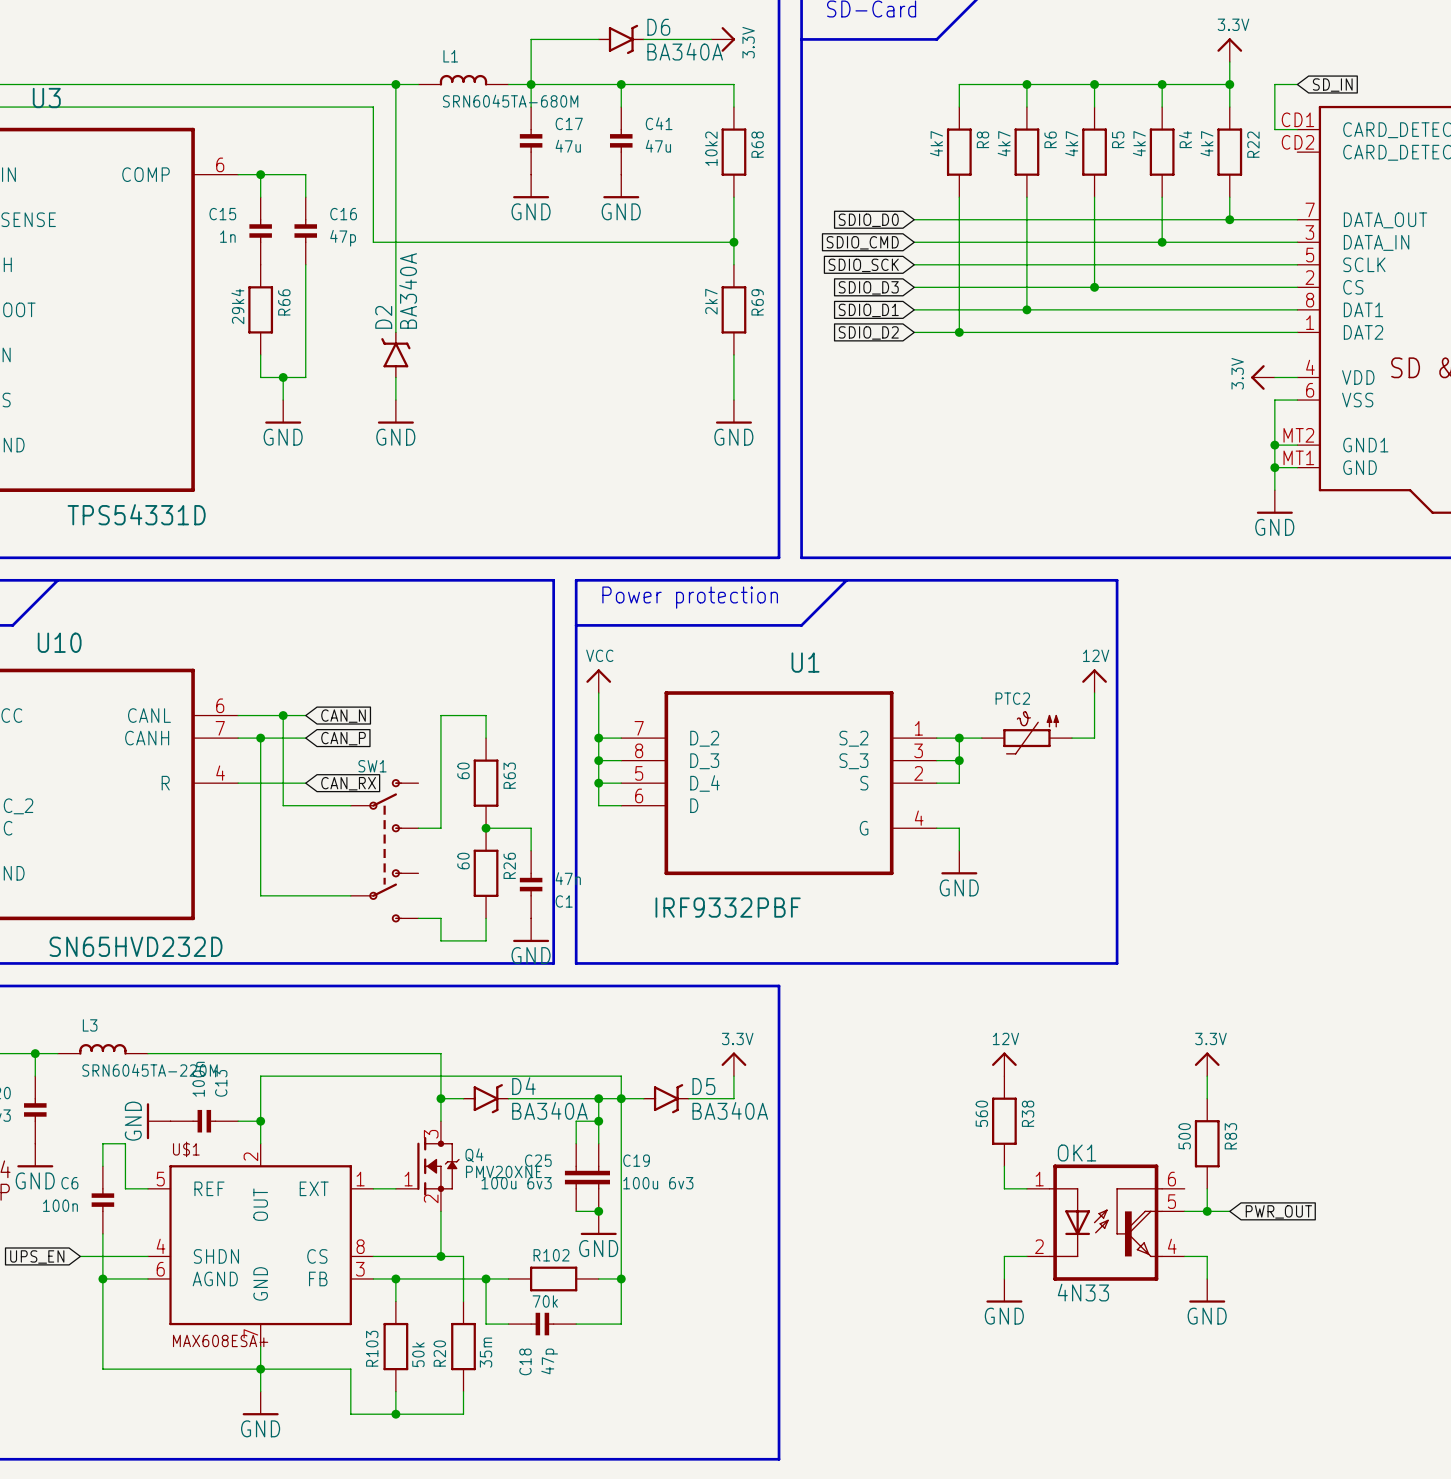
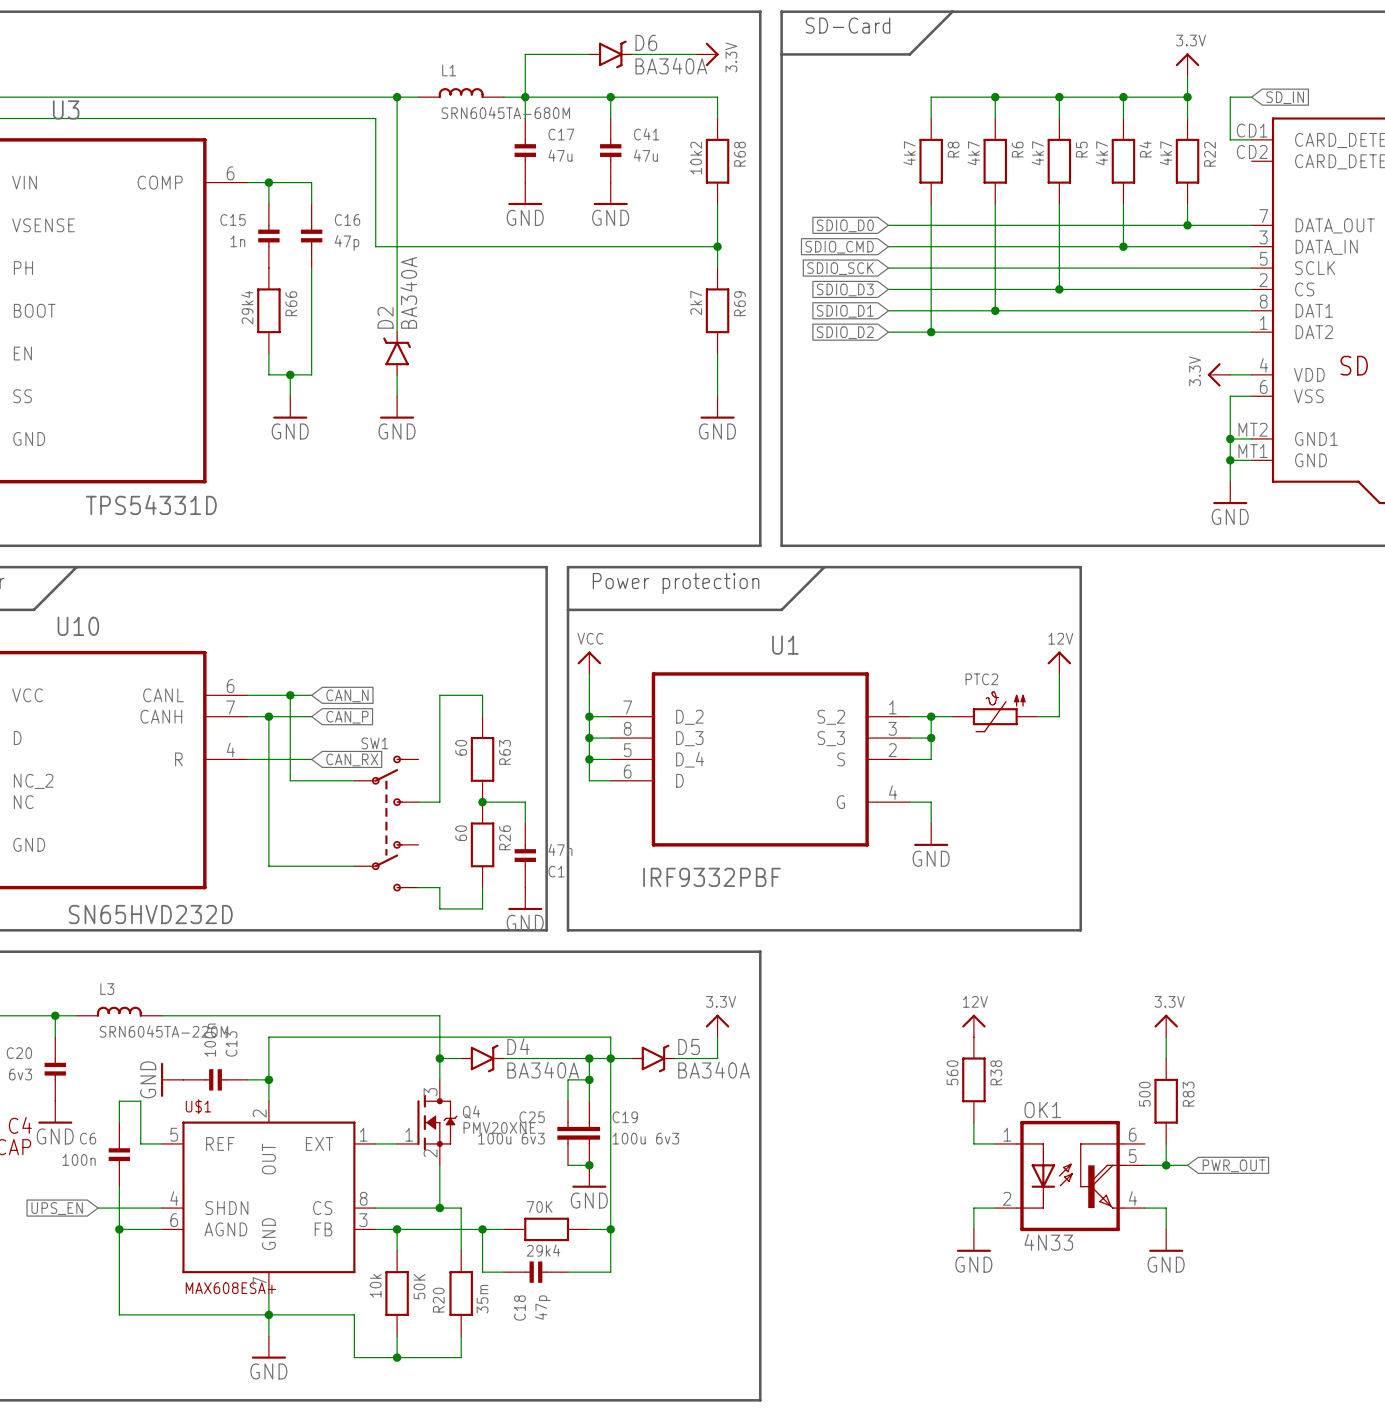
R102 name: R102 (551, 1255) -> 70K (539, 1206)
R102 value: 70k (545, 1301) -> 29k4 (543, 1250)
R103 name: R103 (372, 1348) -> 50K (419, 1286)
R103 value: 50k (418, 1354) -> 10k (375, 1285)

